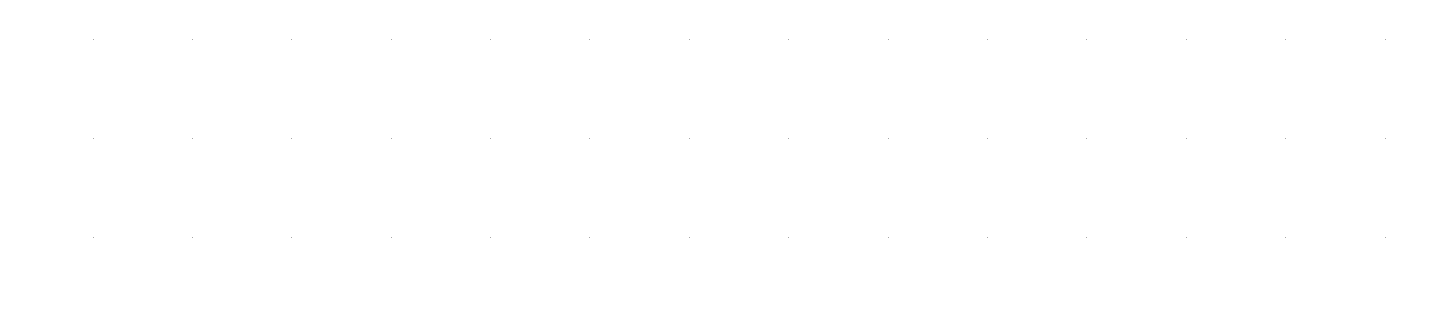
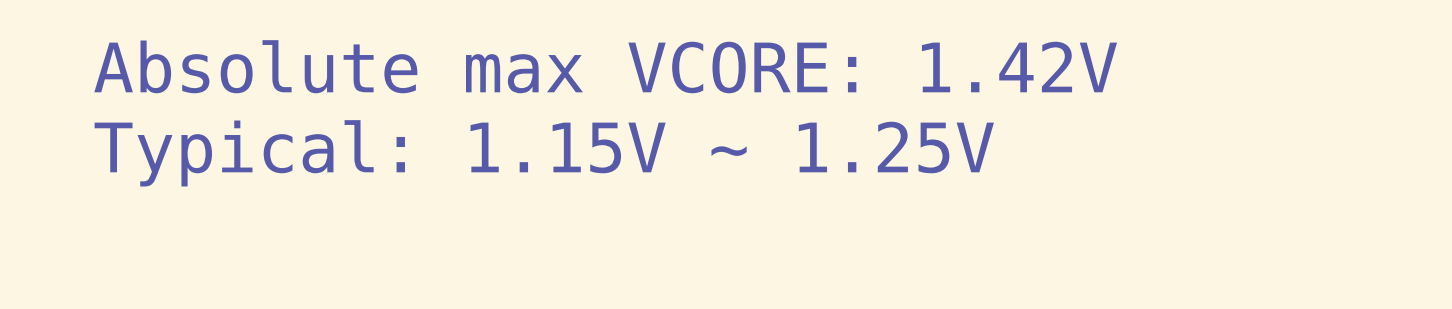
text: none -> Absolute max VCORE: 1.42V (605, 66)
text: none -> Typical: 1.15V ~ 1.25V (544, 153)

